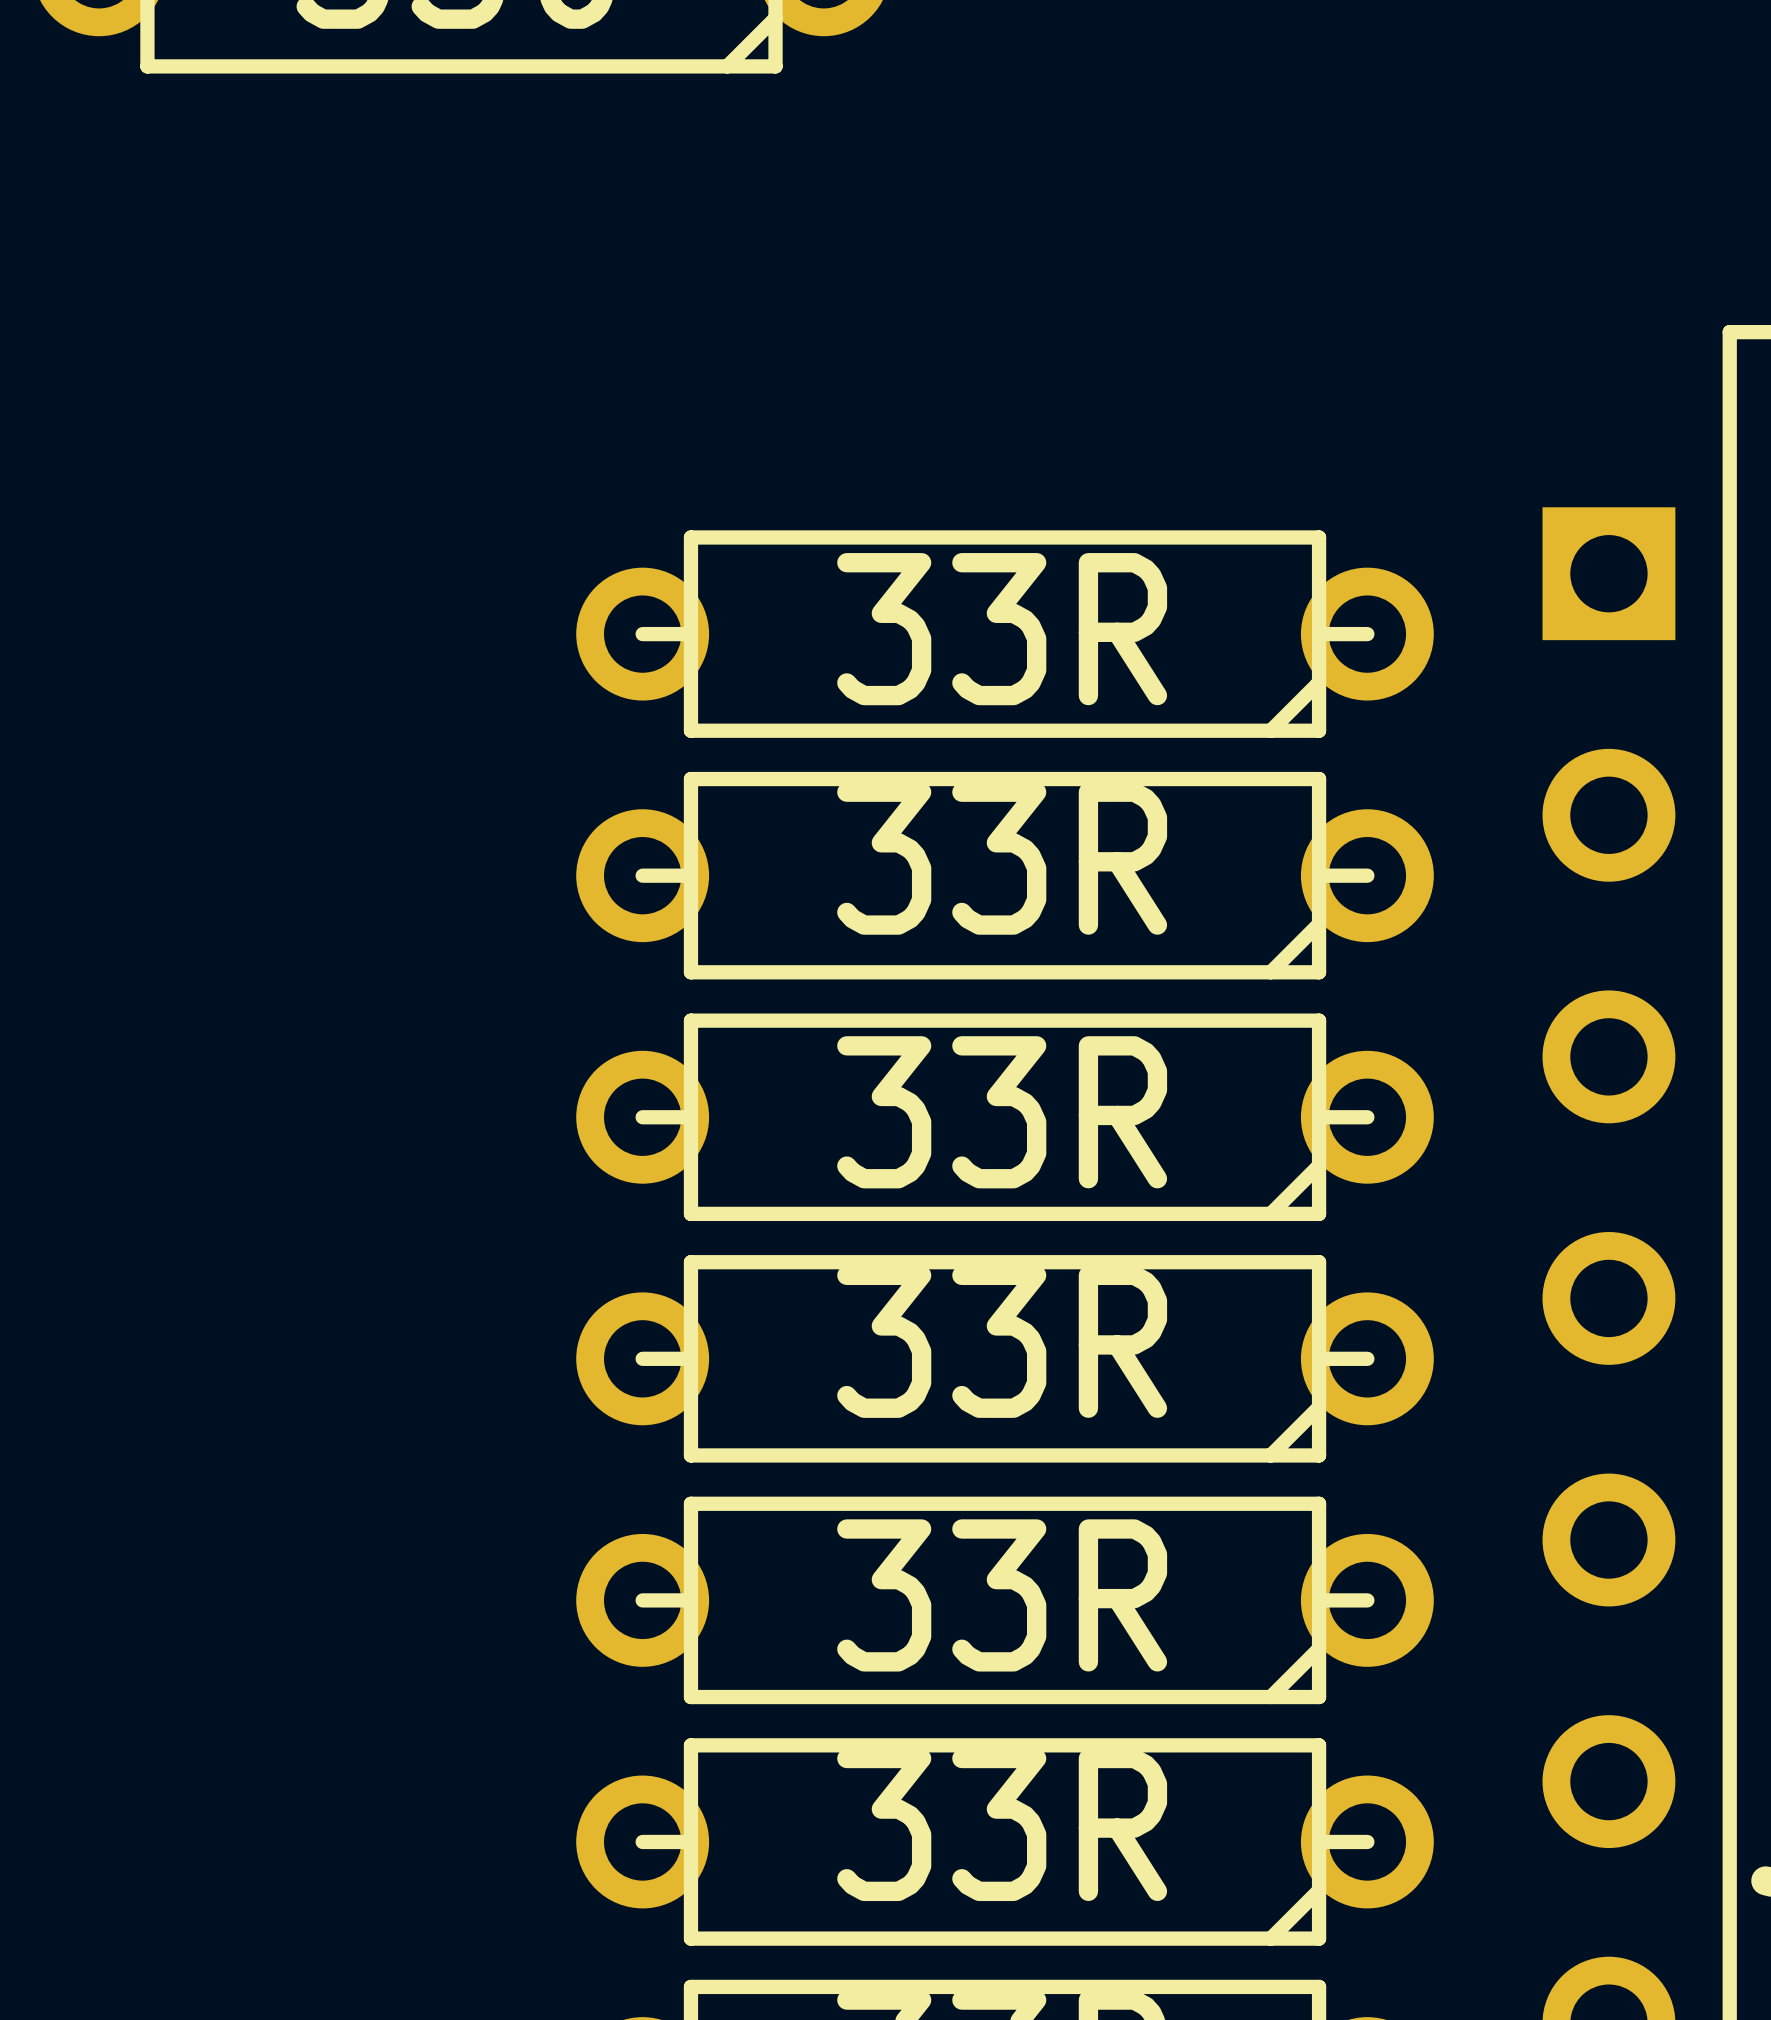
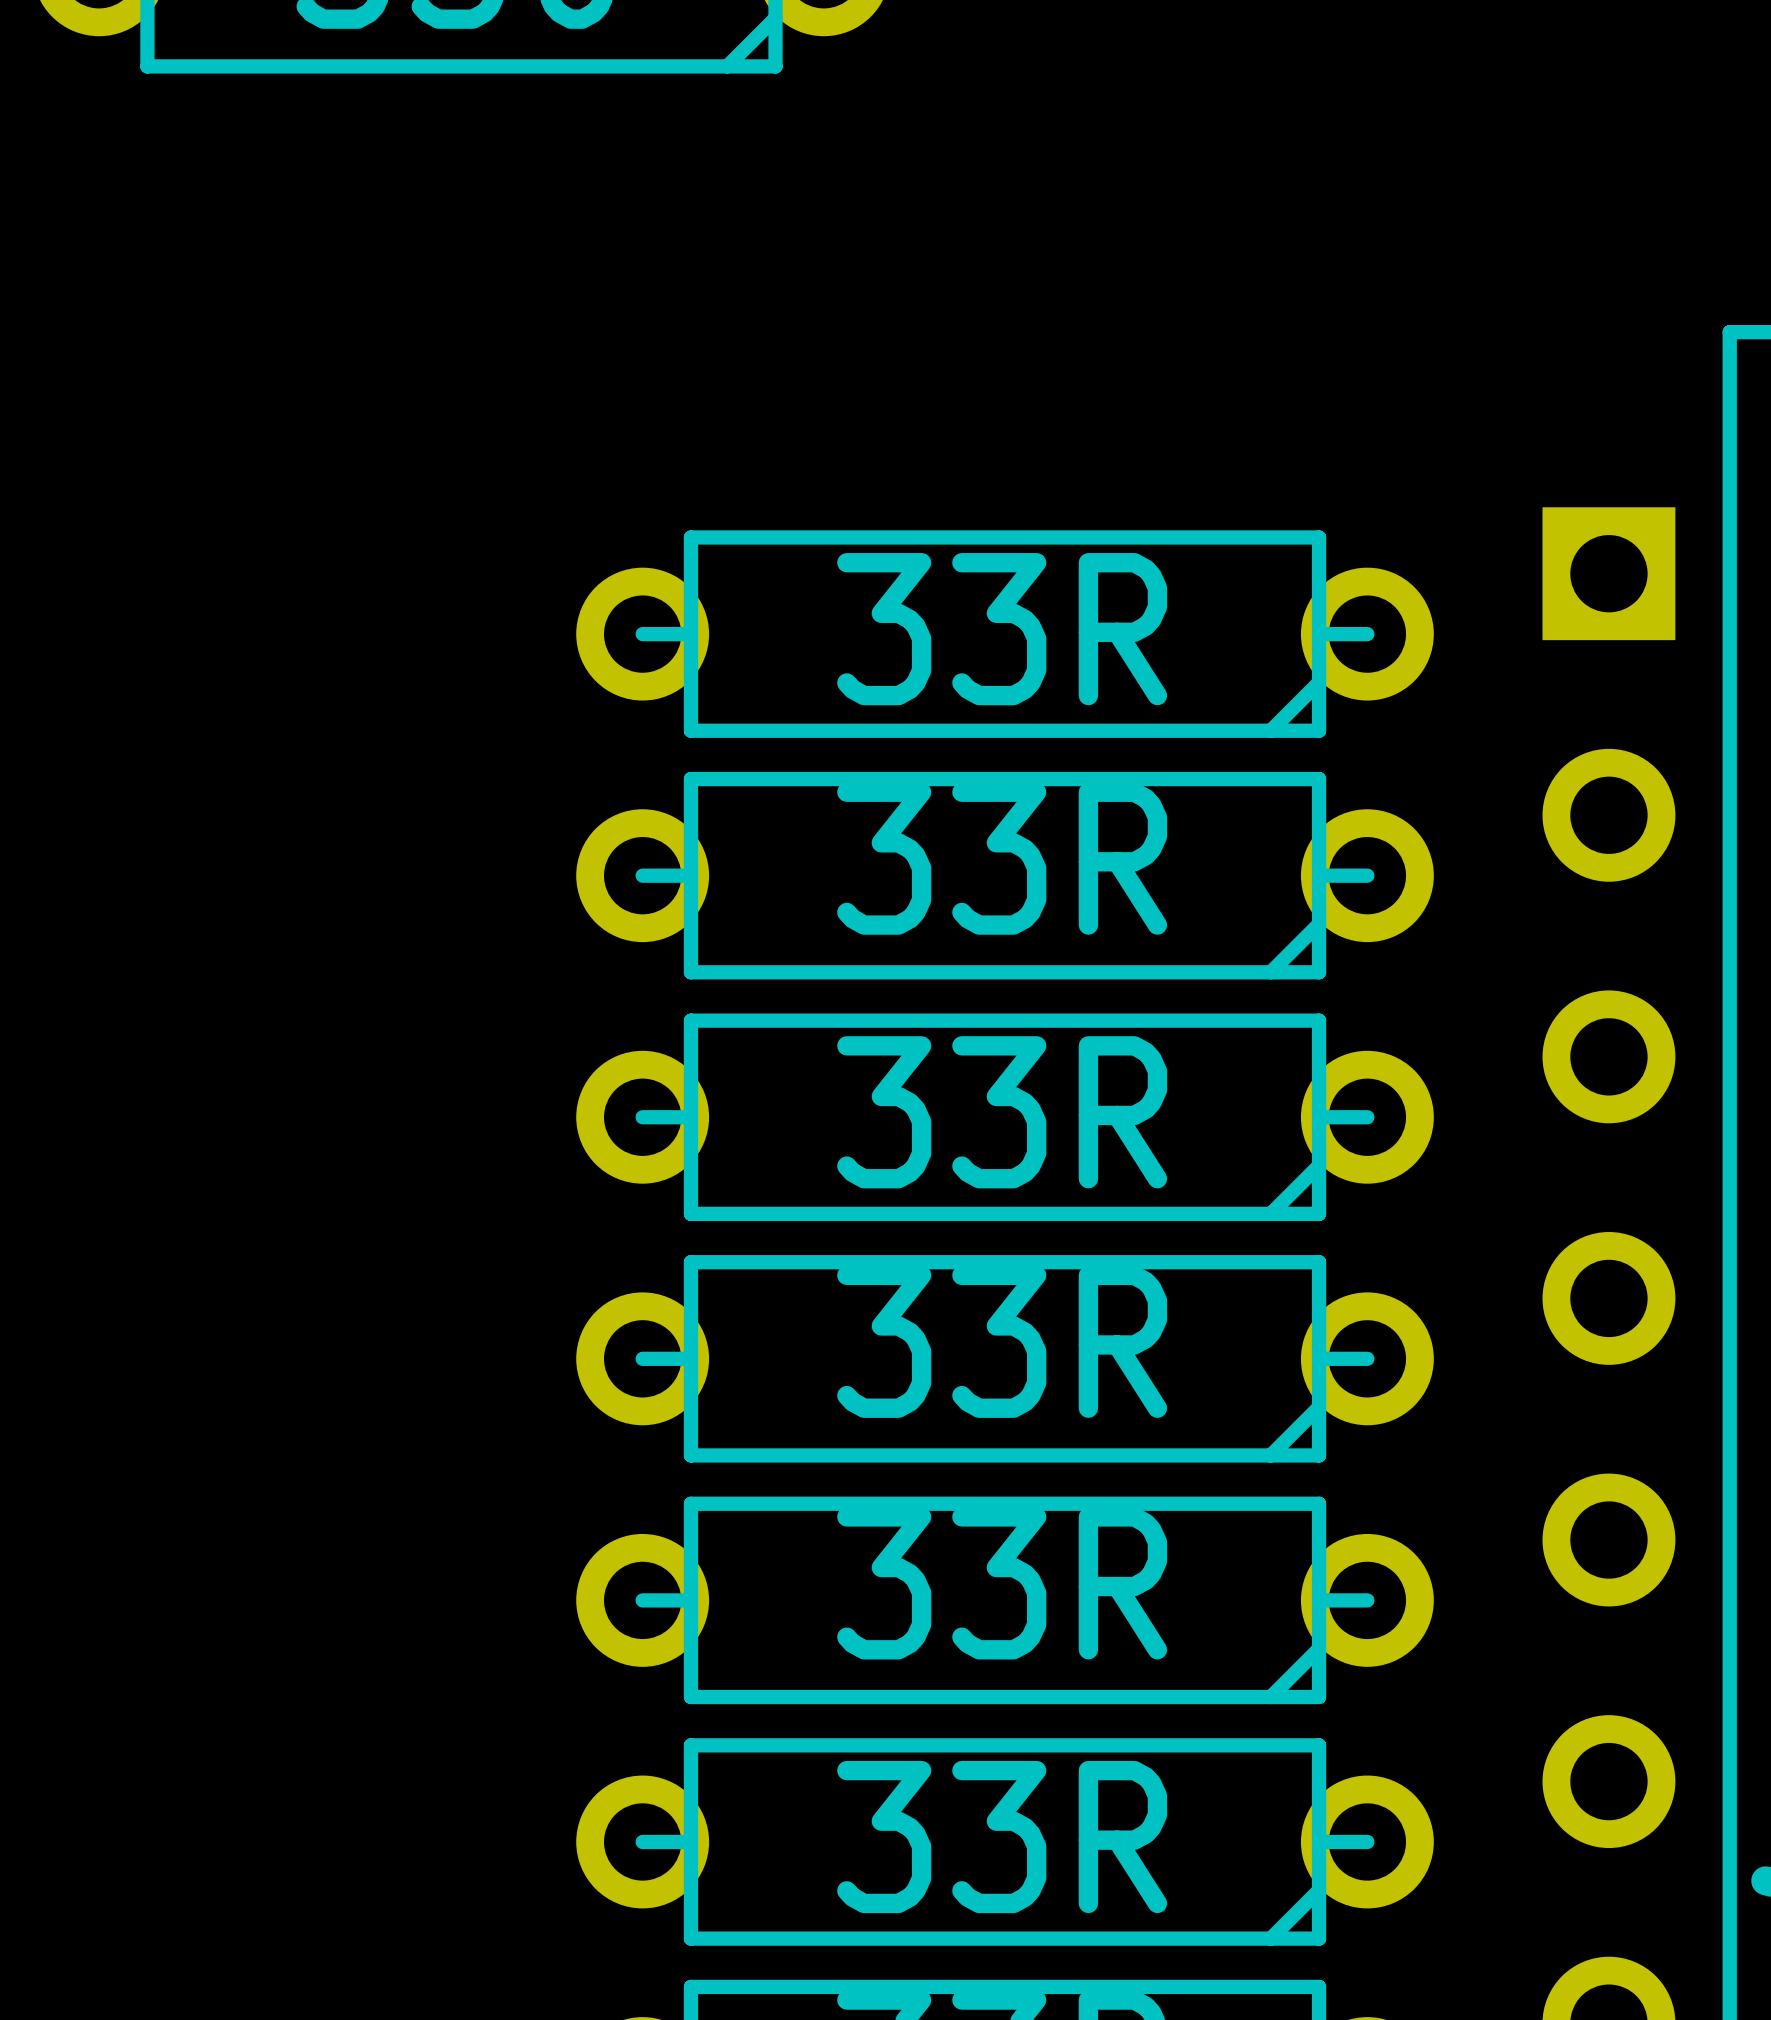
part value position: 33R (1002, 1595) -> 33R (1002, 1583)
part value position: 33R (1002, 1824) -> 33R (1002, 1837)

